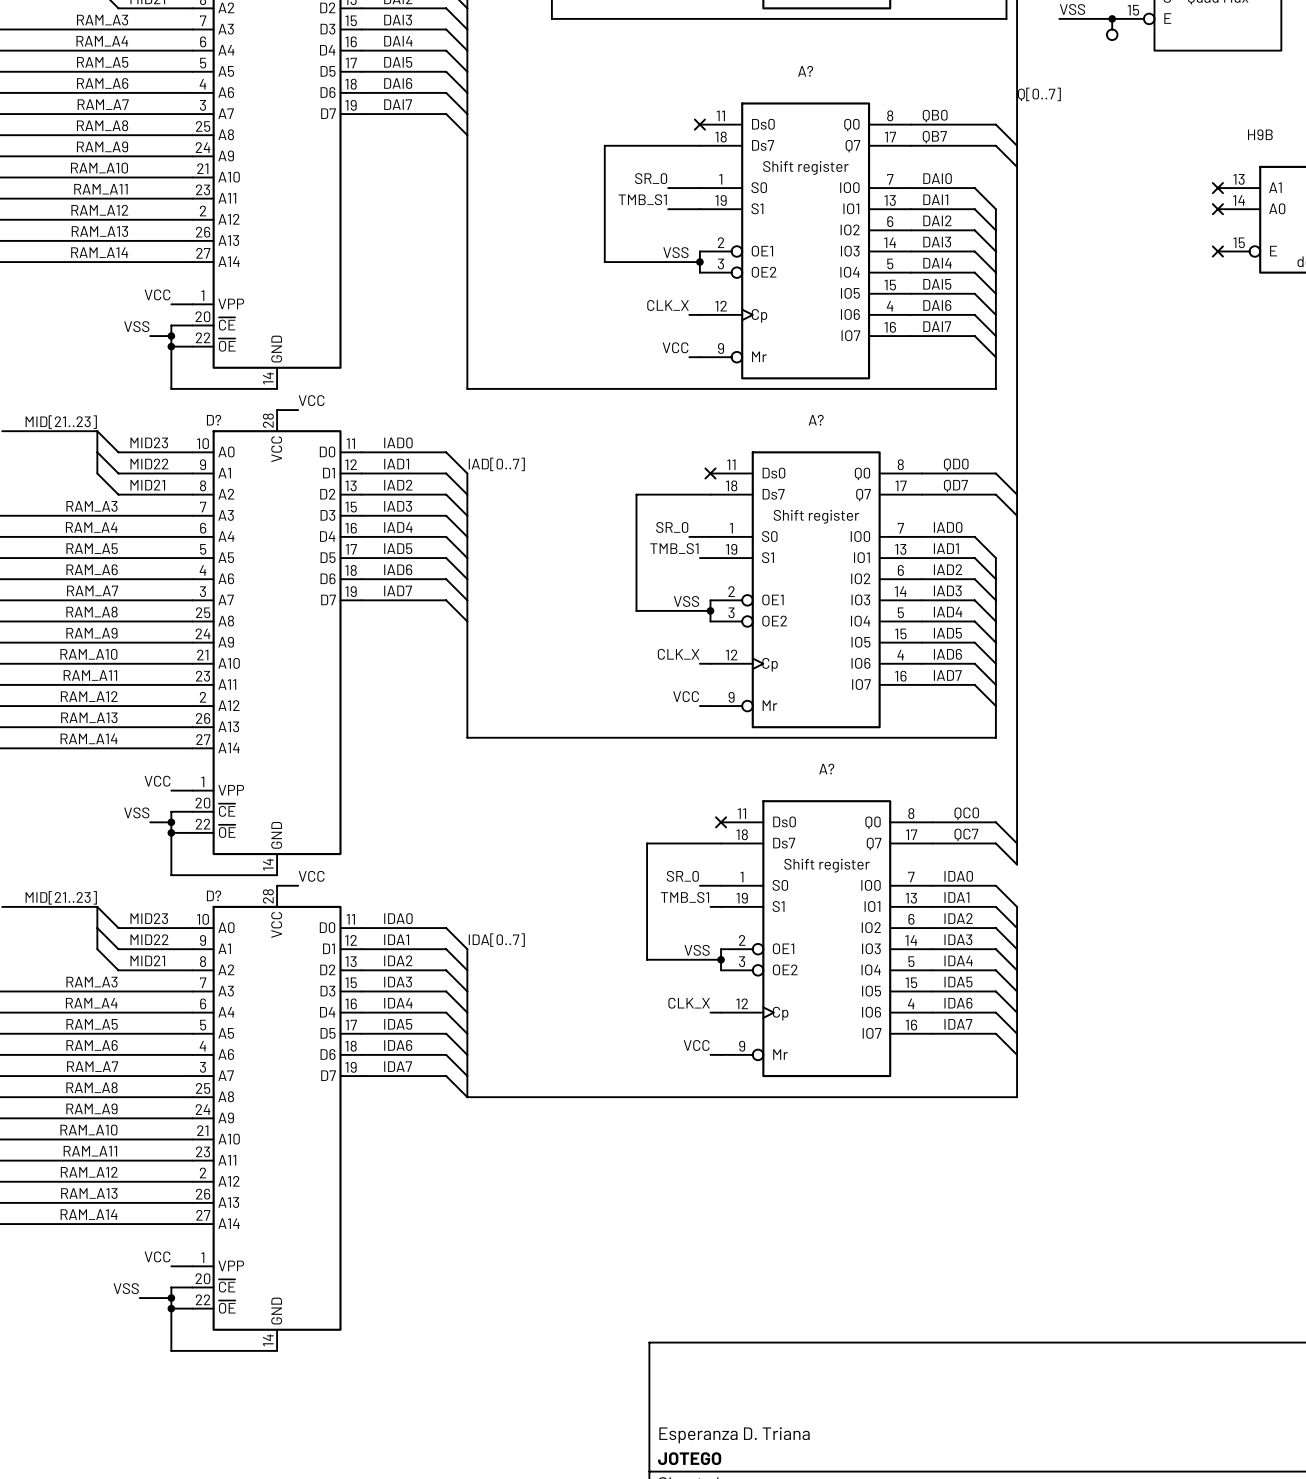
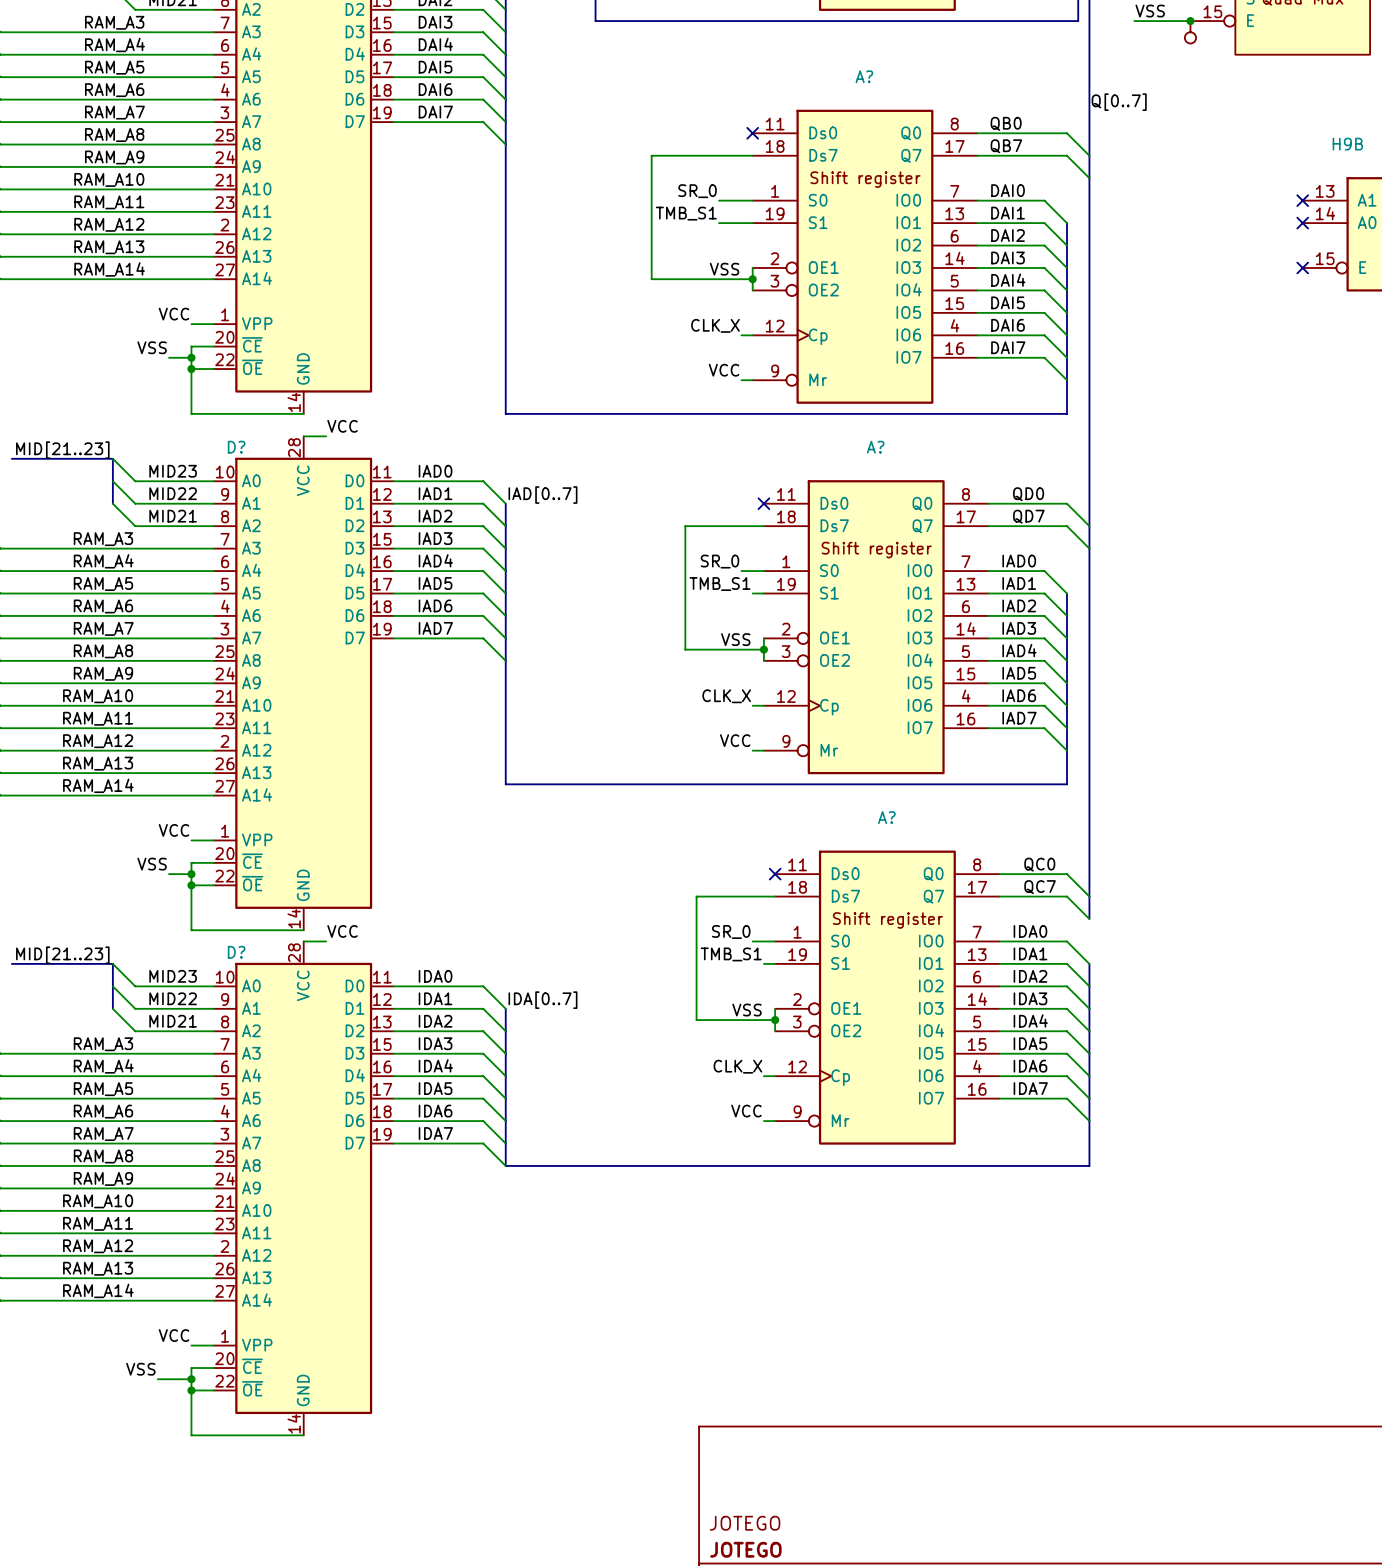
title block: Esperanza D. Triana (734, 1435) -> JOTEGO (745, 1523)

